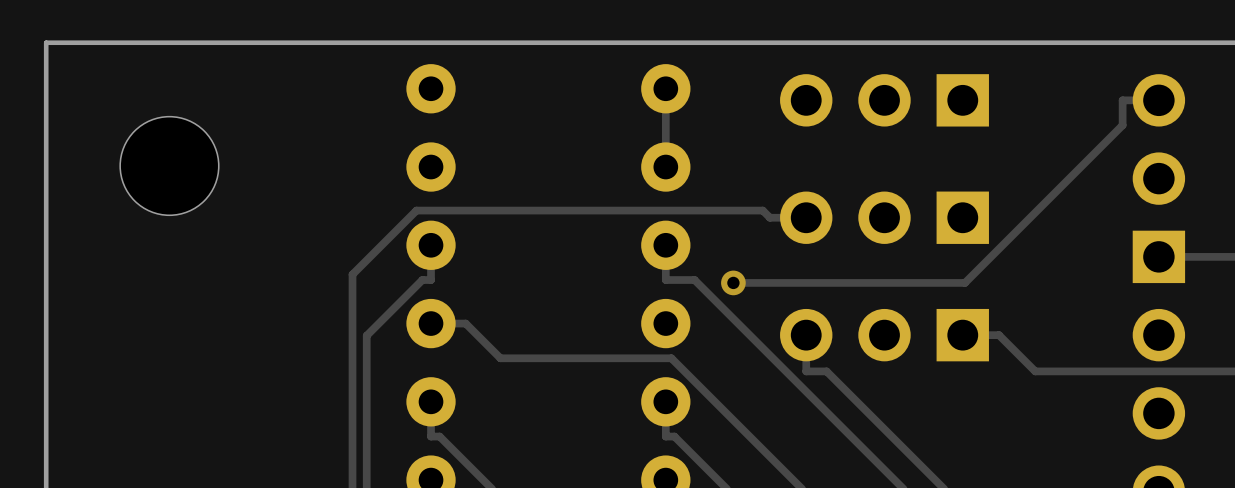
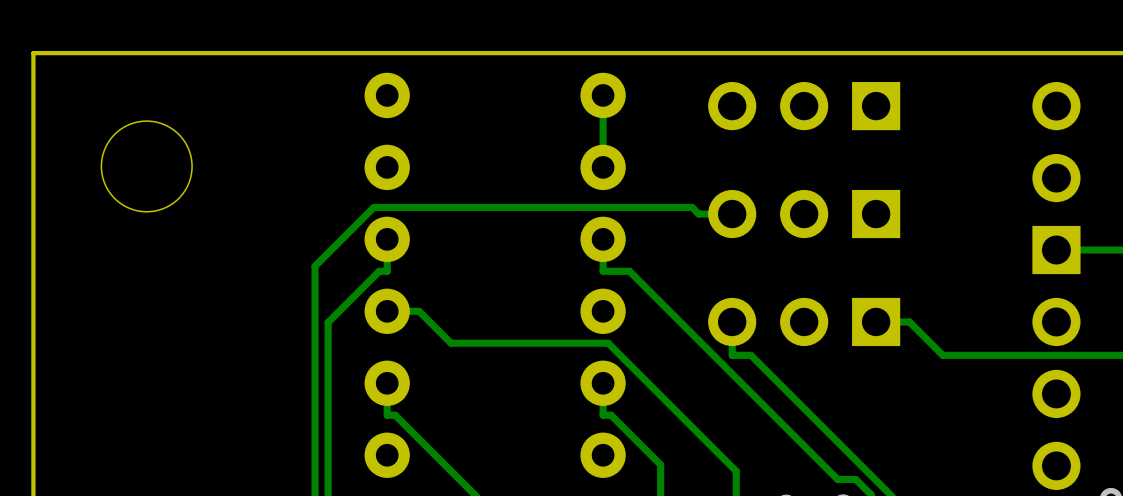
track: (1158, 100) (1122, 100) (1122, 125) (964, 282) (733, 282) -> none
via: (733, 282) -> none

